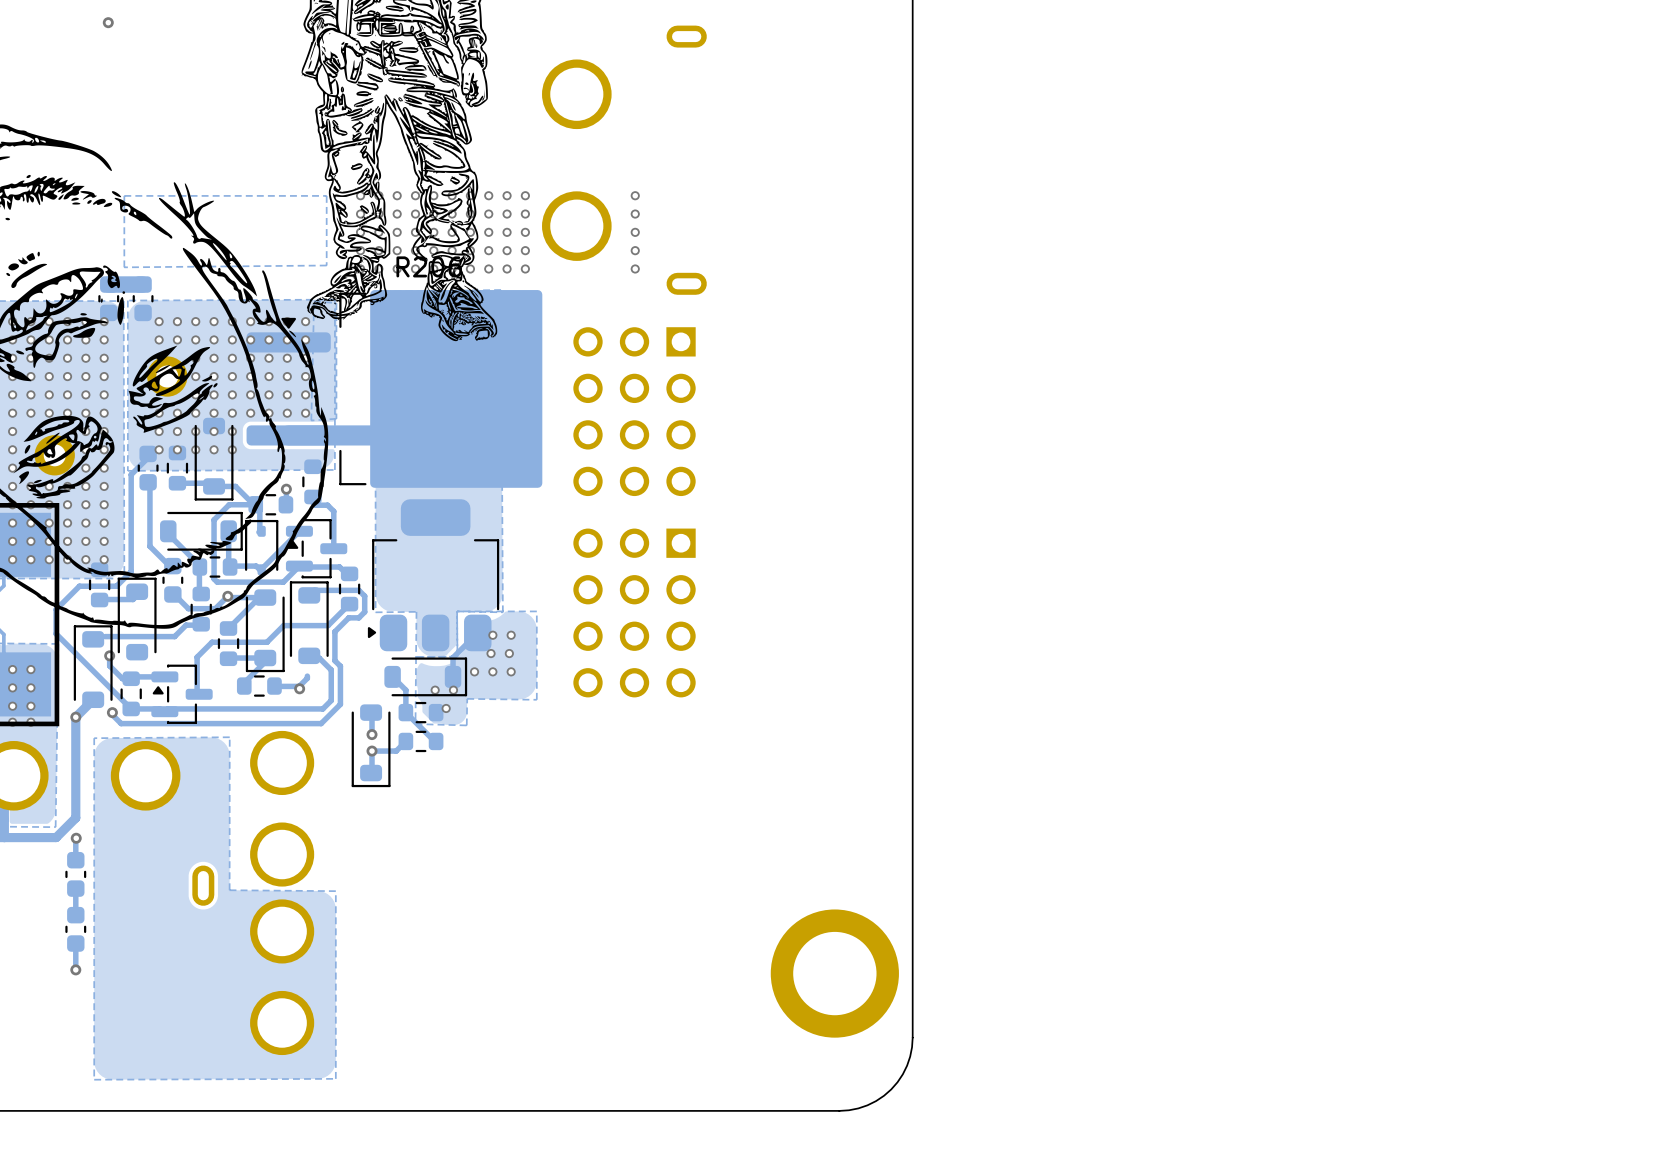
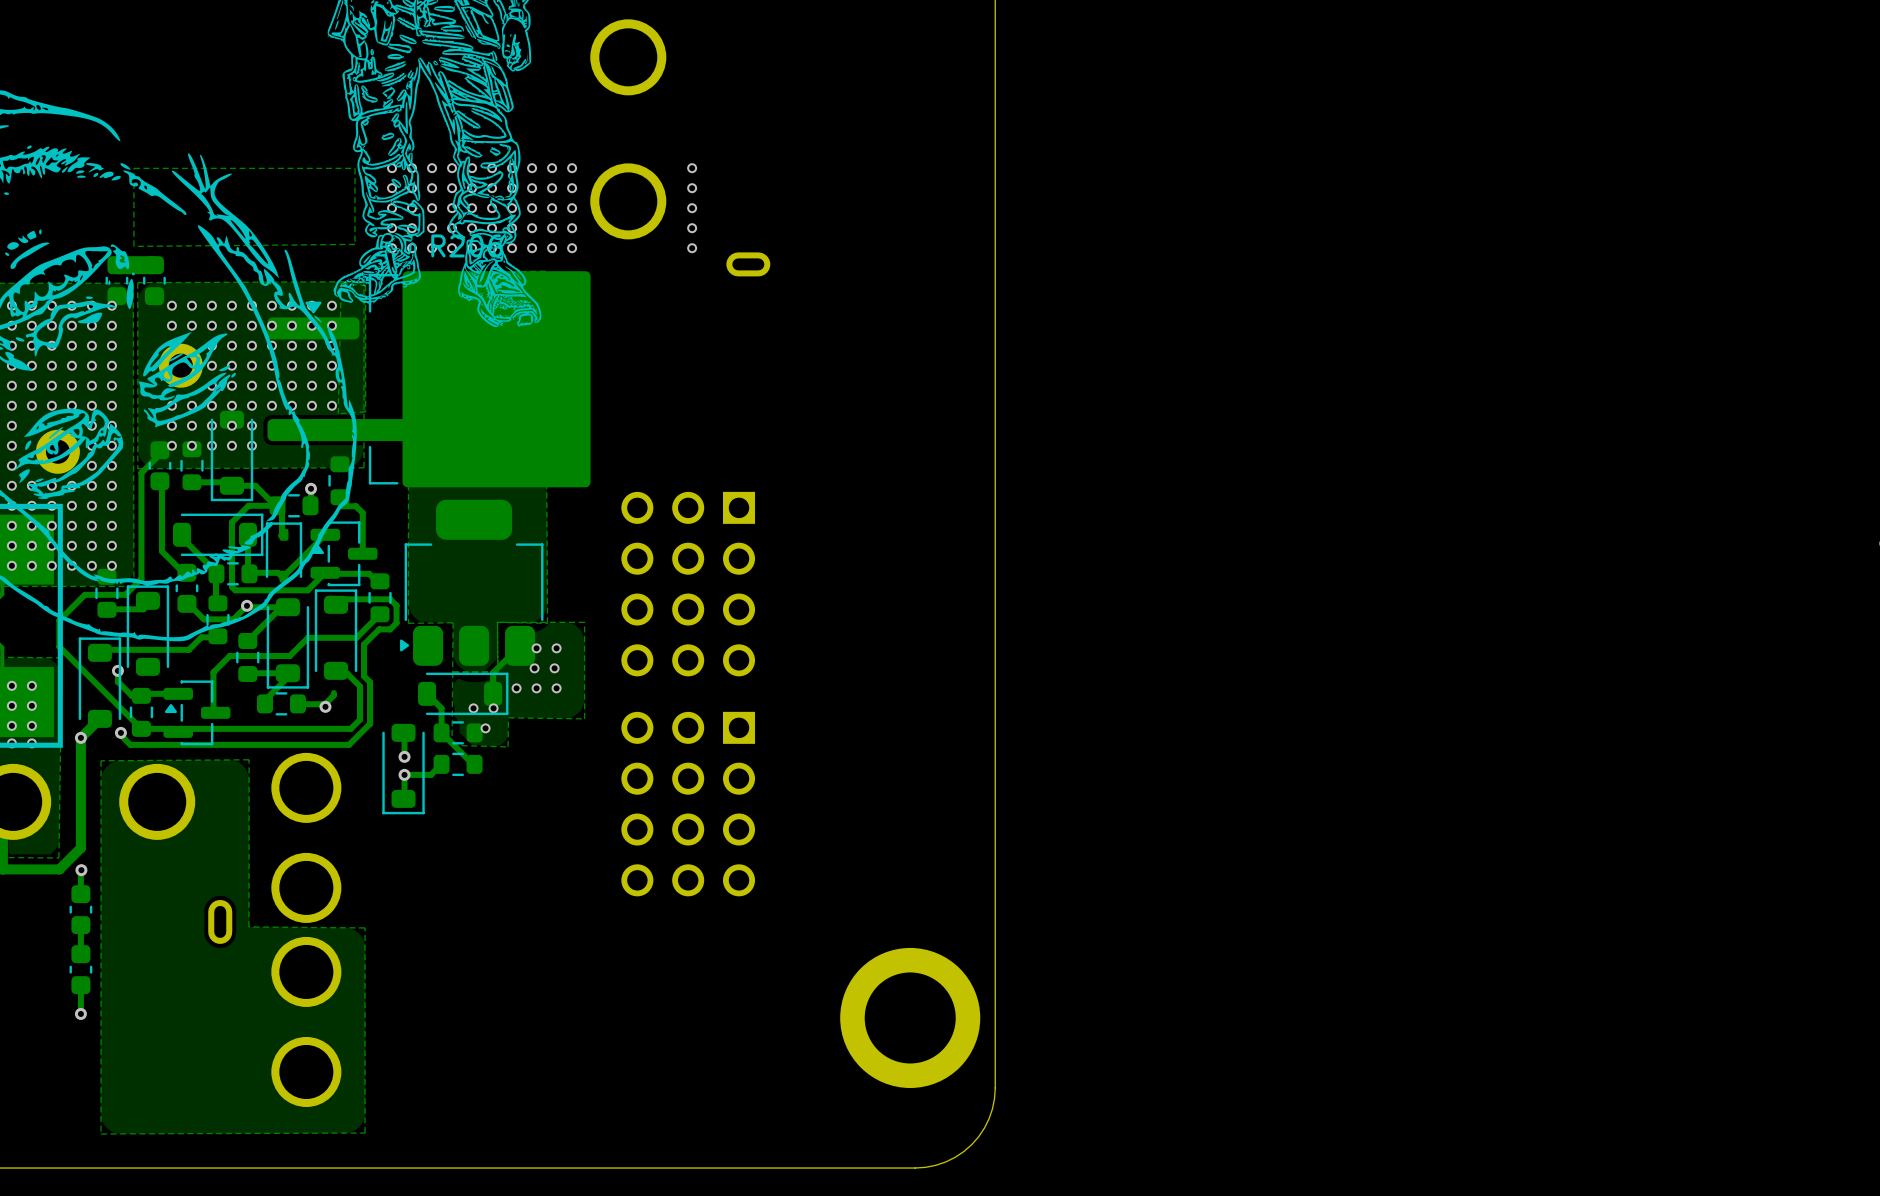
part: (634, 411) -> none
part position: (634, 612) -> (688, 584)
part: none -> (688, 804)

